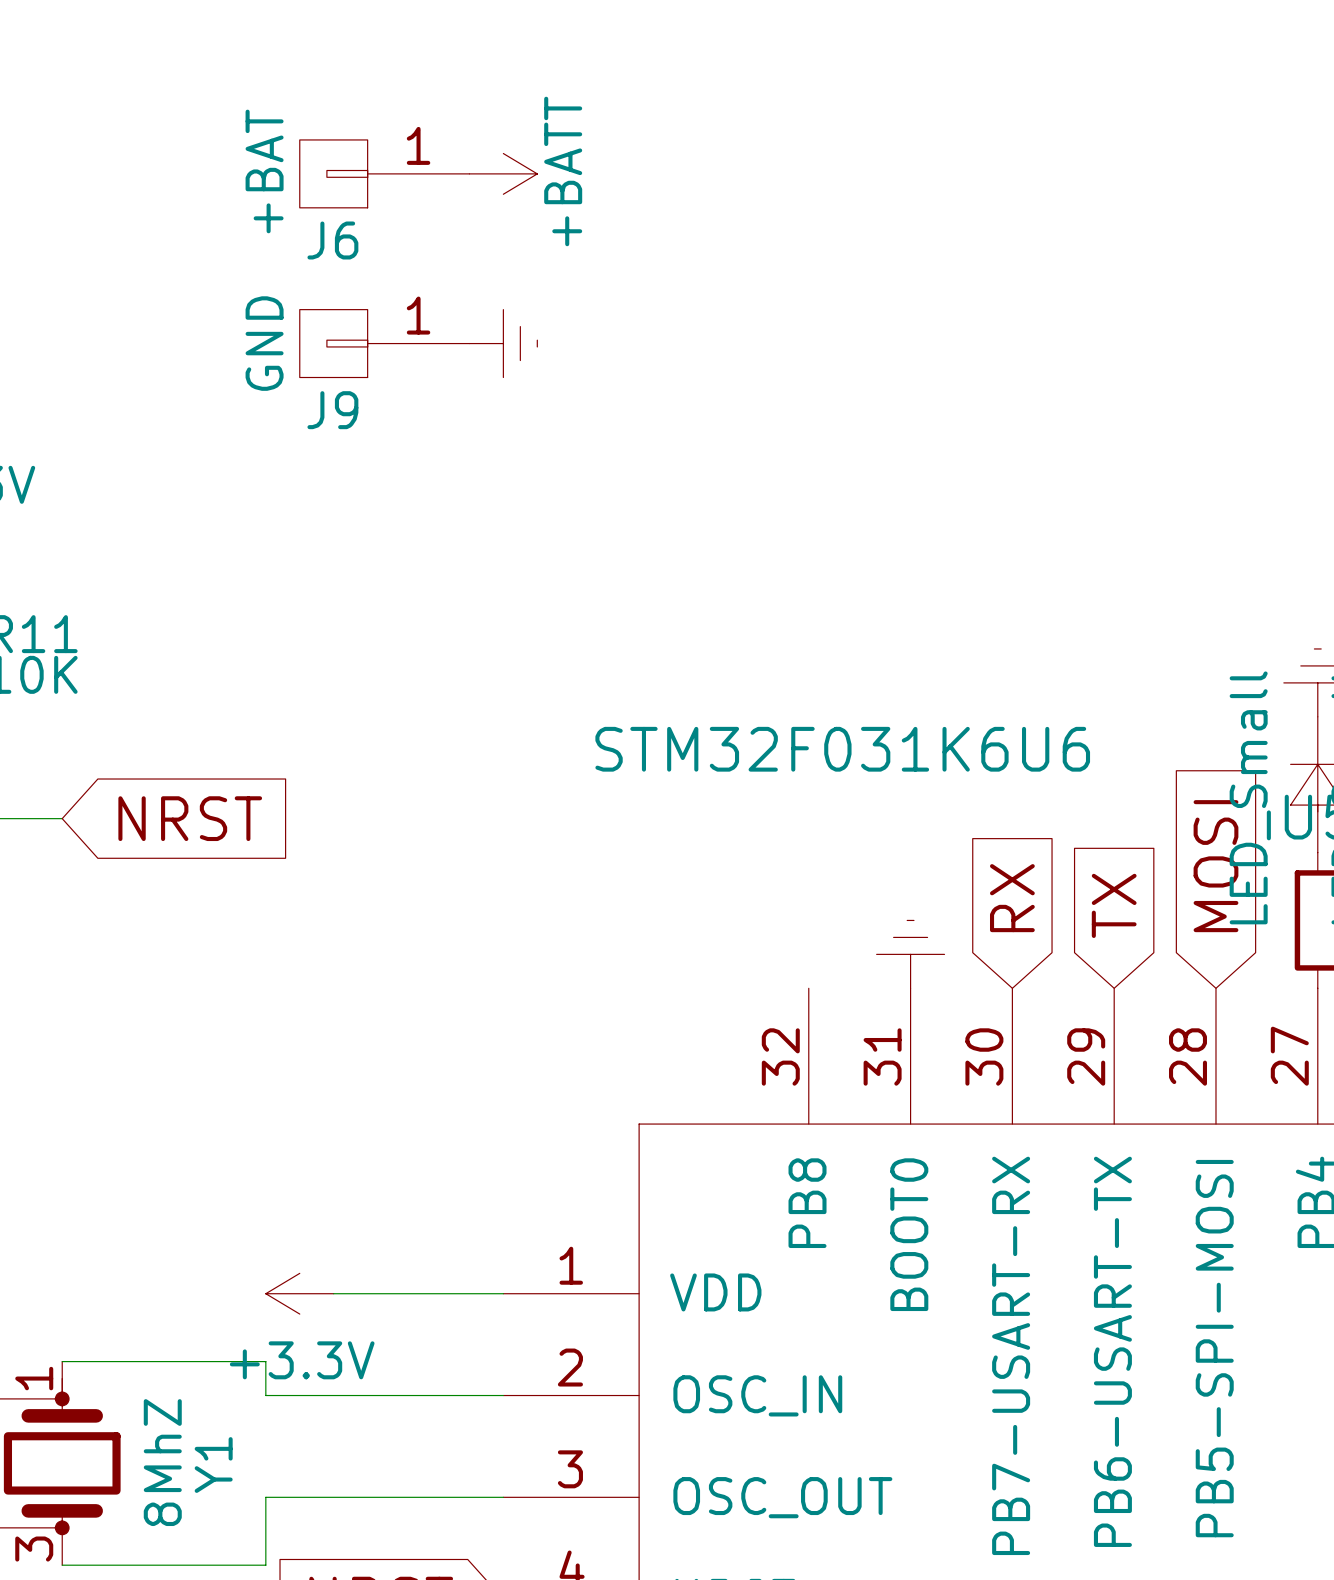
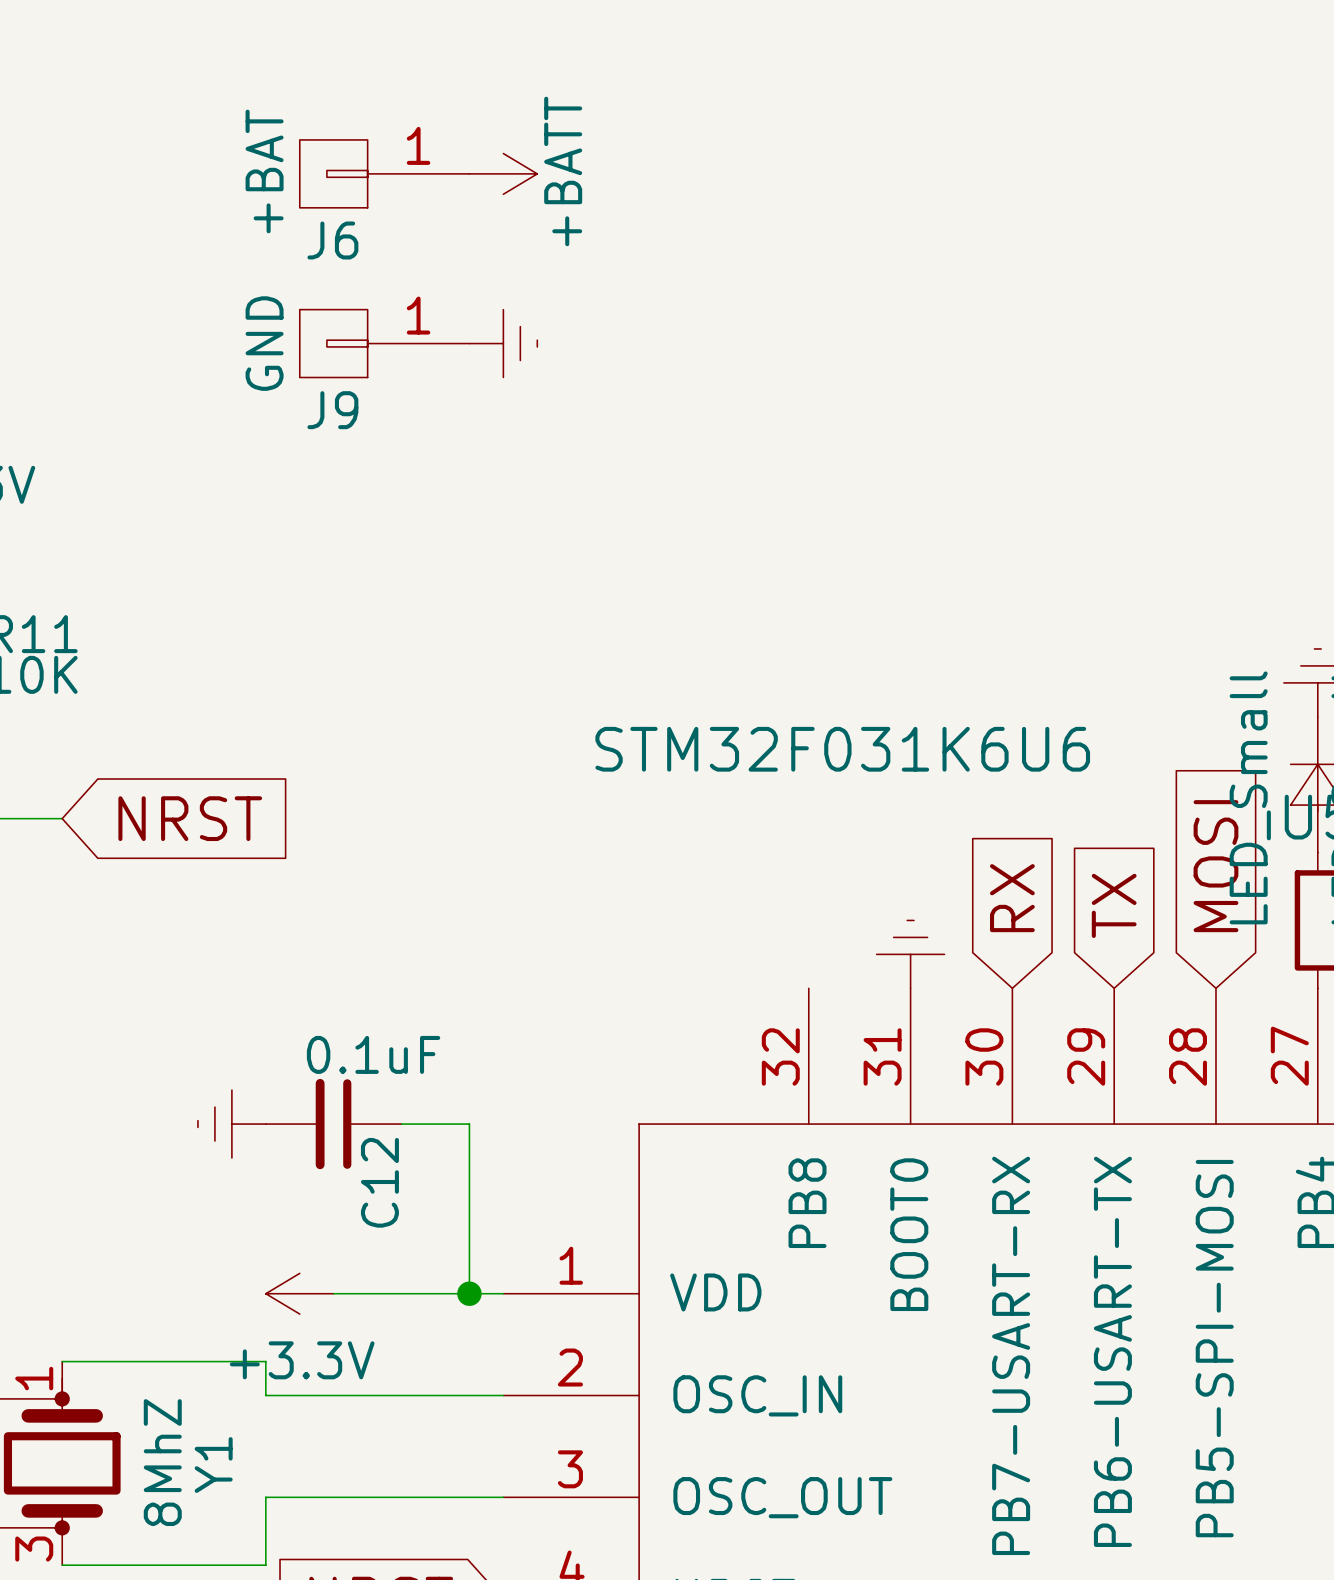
power symbol: none -> (231, 1124)
C12: none -> 0.1uF (333, 1124)
wire: none -> (401, 1124) (469, 1124) (469, 1293)
junction: none -> (469, 1293)

